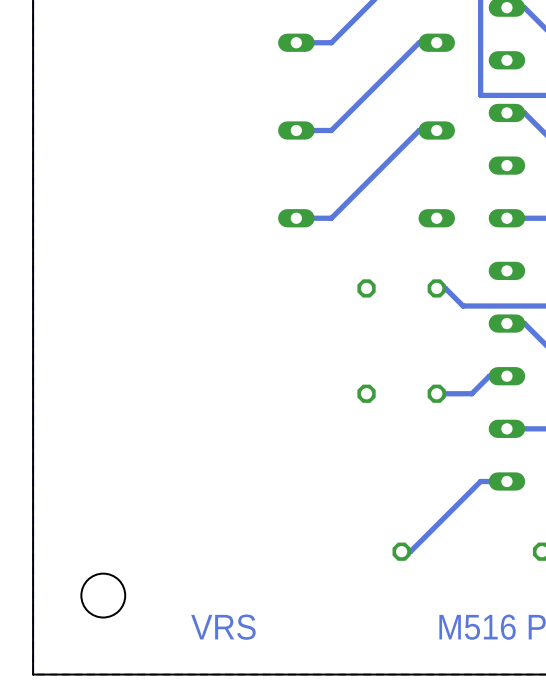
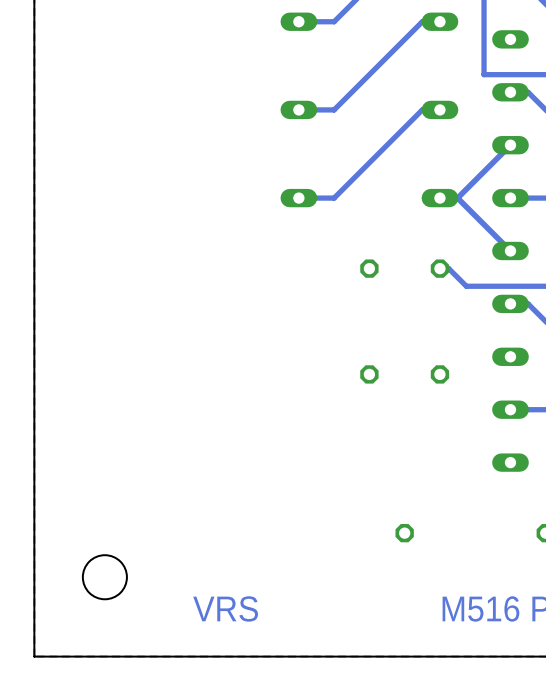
track: none -> (510, 145) (457, 198)
track: none -> (457, 198) (510, 250)
track: (506, 376) (489, 376) (471, 393) (436, 393) -> none
track: (506, 481) (480, 481) (410, 551) (401, 551) -> none

